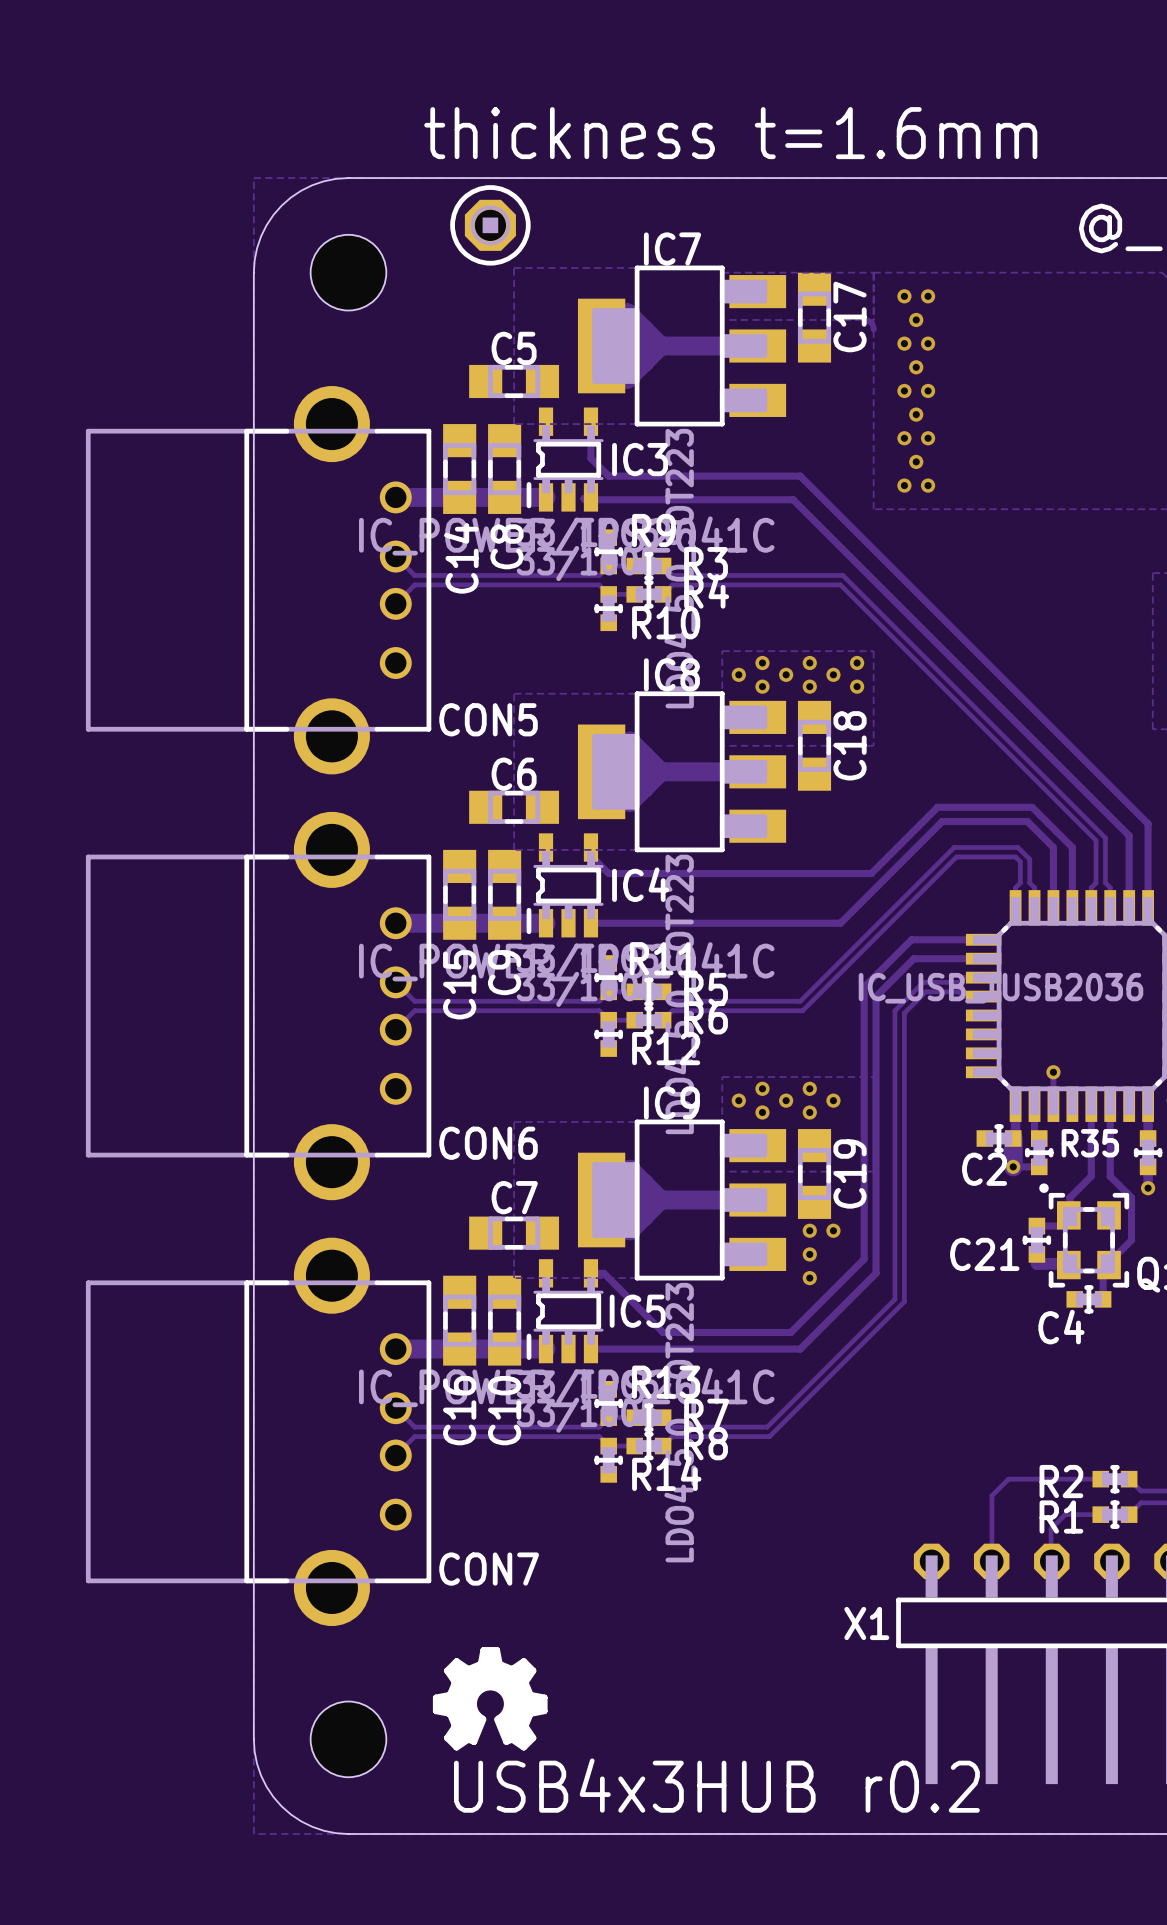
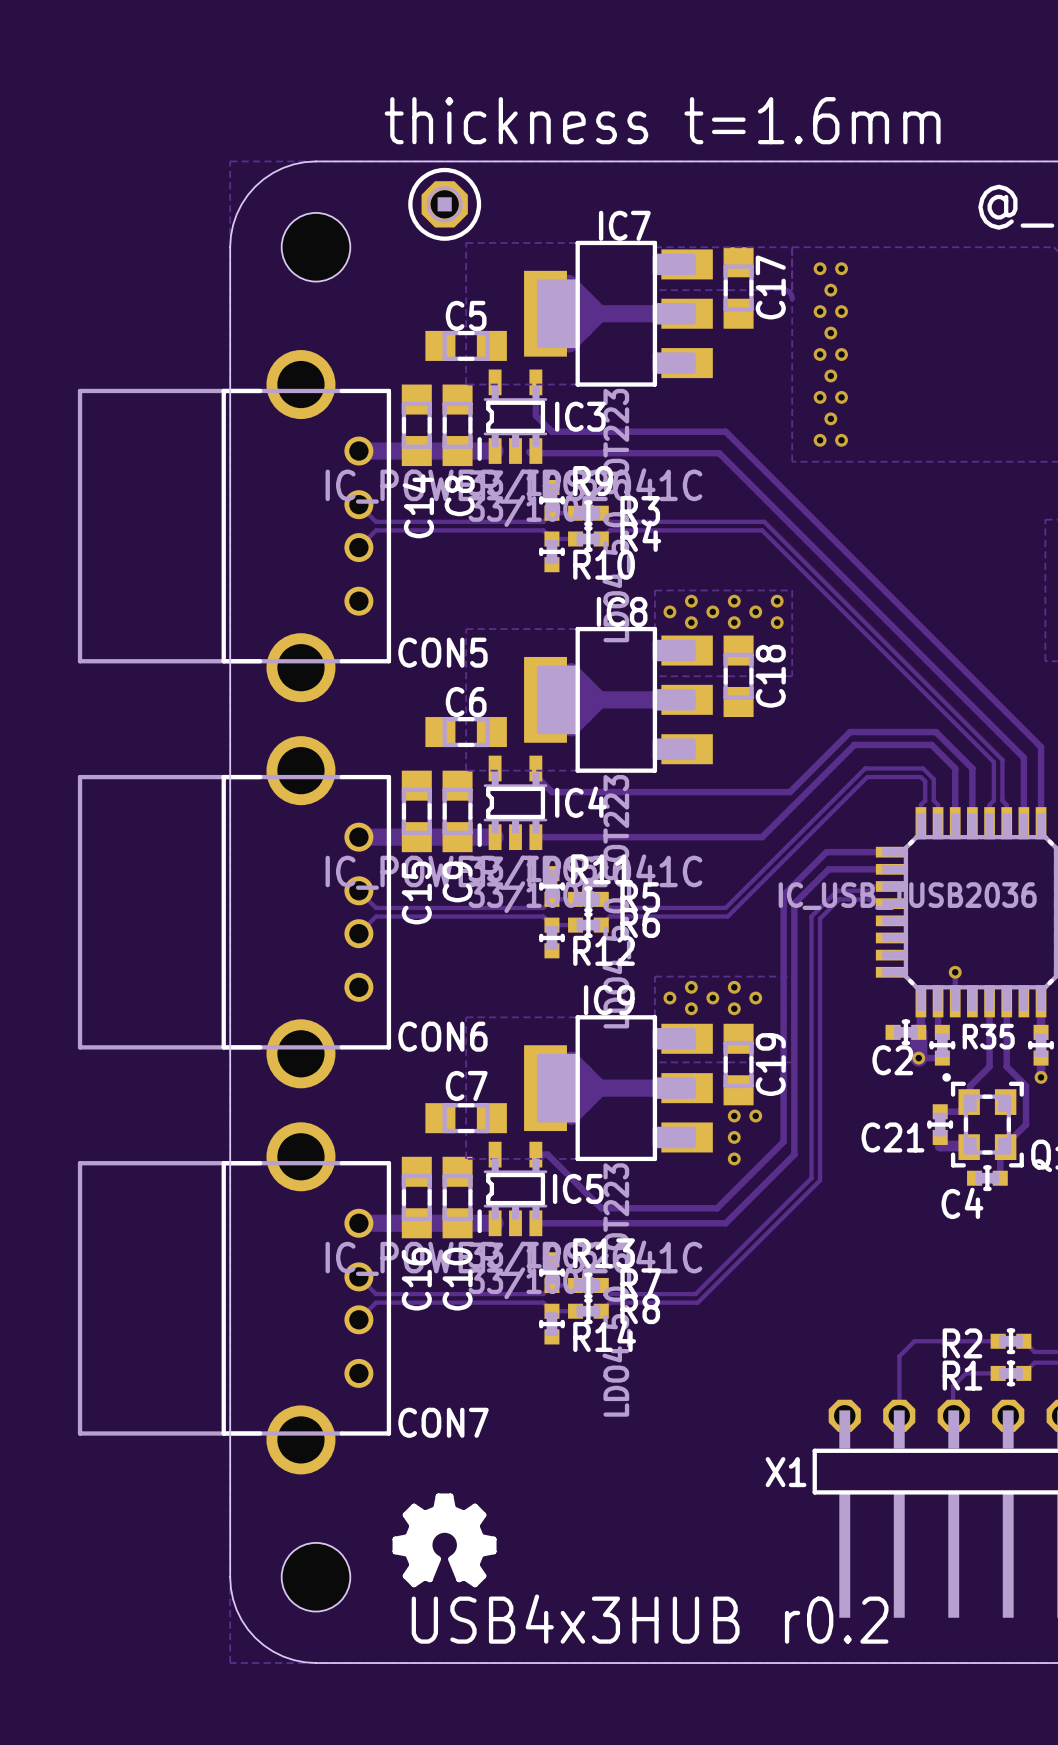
IC7 name position: IC7 (672, 249) -> IC7 (624, 225)
IC8 name position: IC8 (671, 674) -> IC8 (622, 611)

